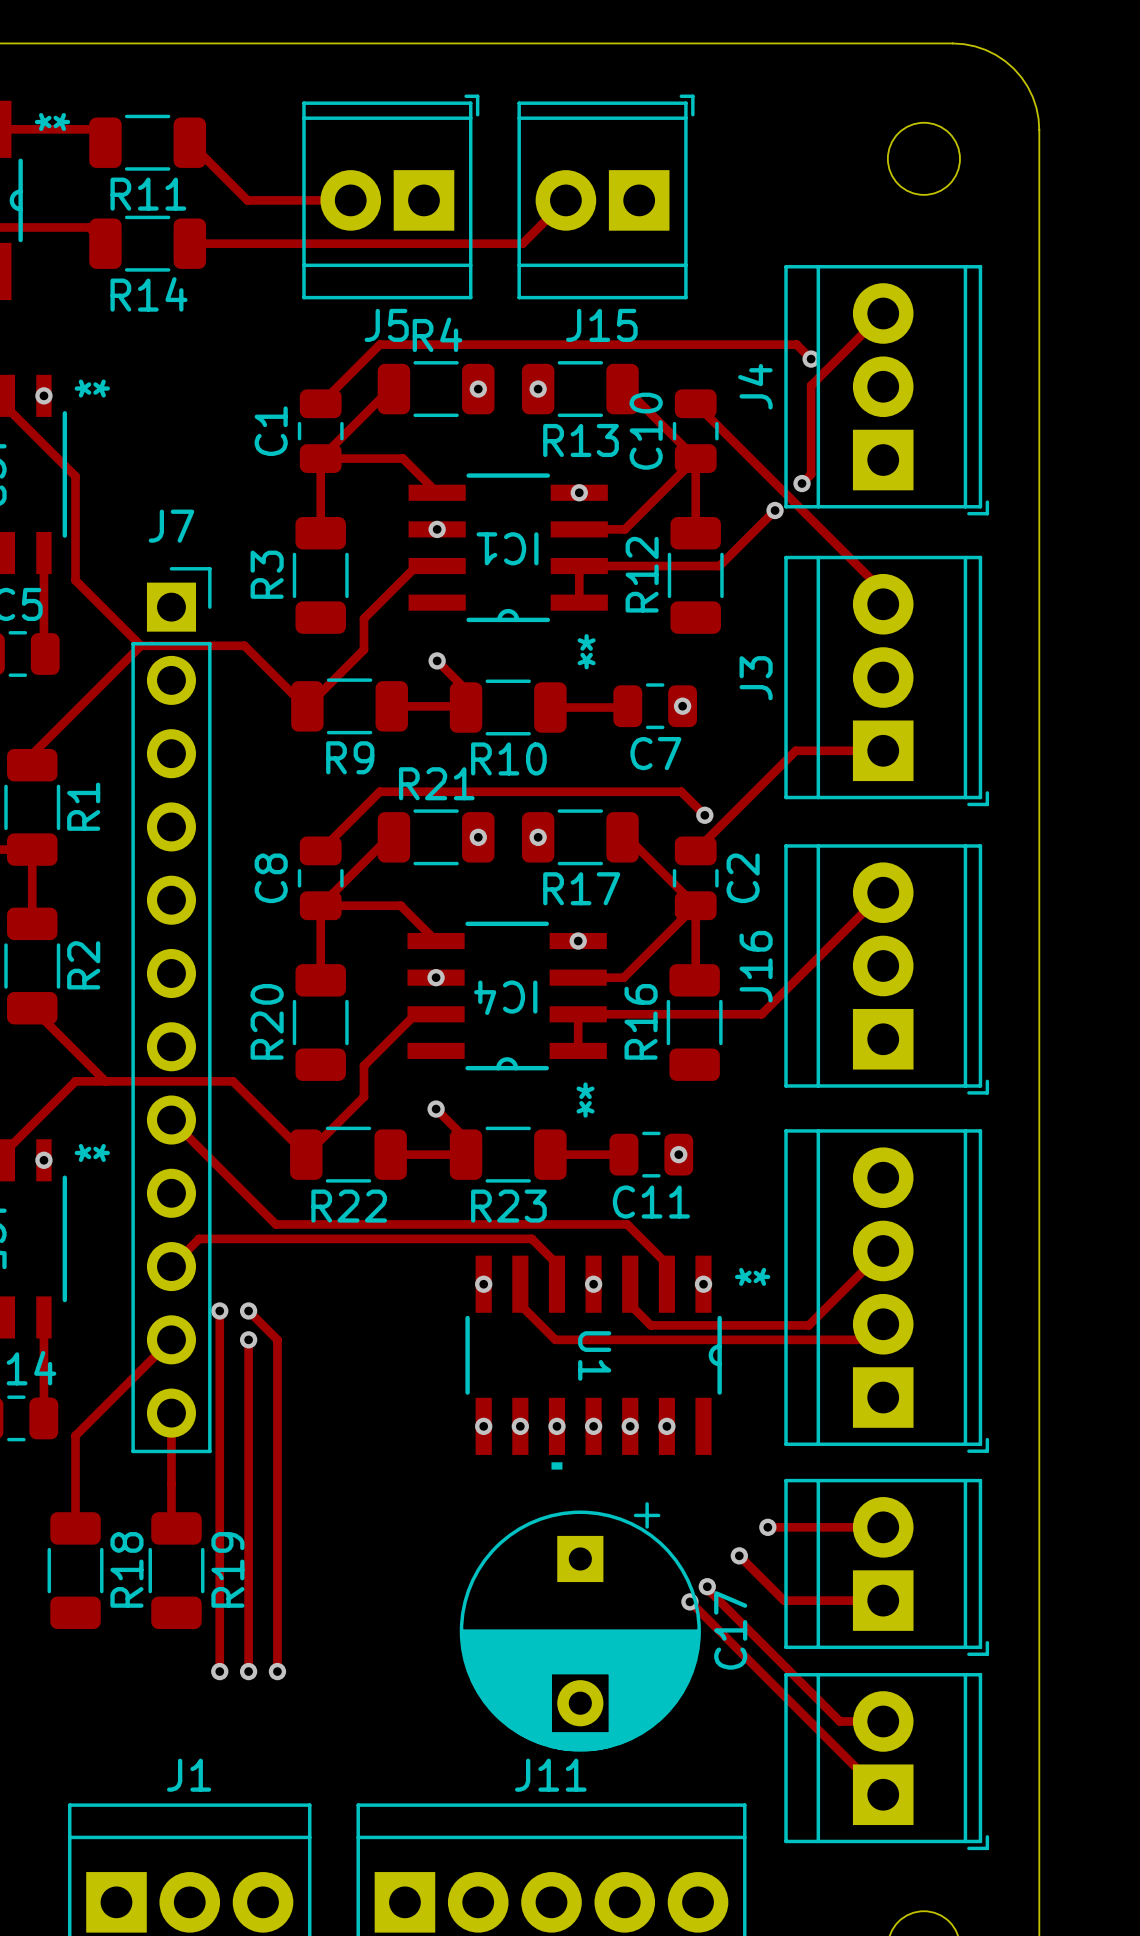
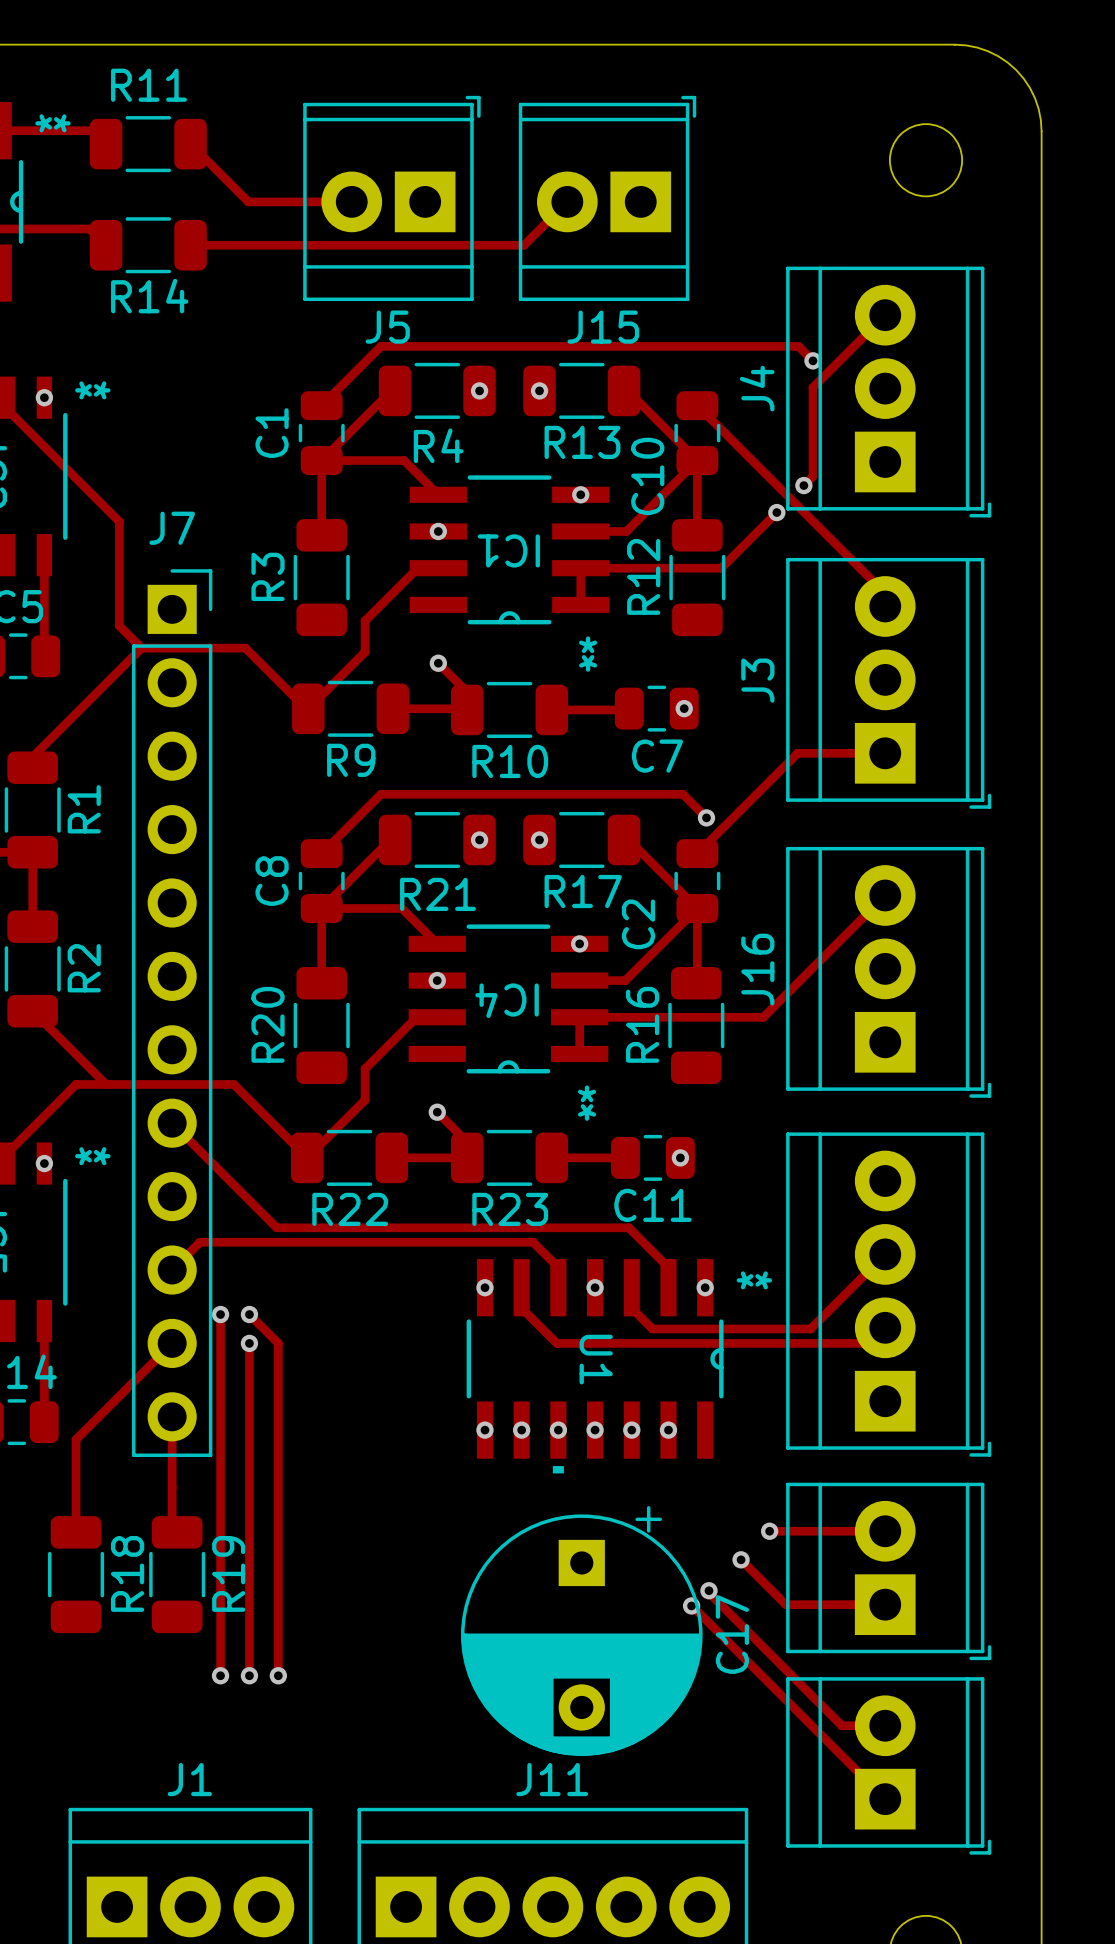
R11 name position: R11 (148, 194) -> R11 (148, 85)
R4 name position: R4 (437, 334) -> R4 (438, 445)
C10 name position: C10 (646, 431) -> C10 (647, 476)
track: (75, 476) (75, 580) (118, 623) -> (76, 478) (119, 521) (119, 625)
R21 name position: R21 (436, 783) -> R21 (437, 894)
C2 name position: C2 (743, 878) -> C2 (638, 924)

